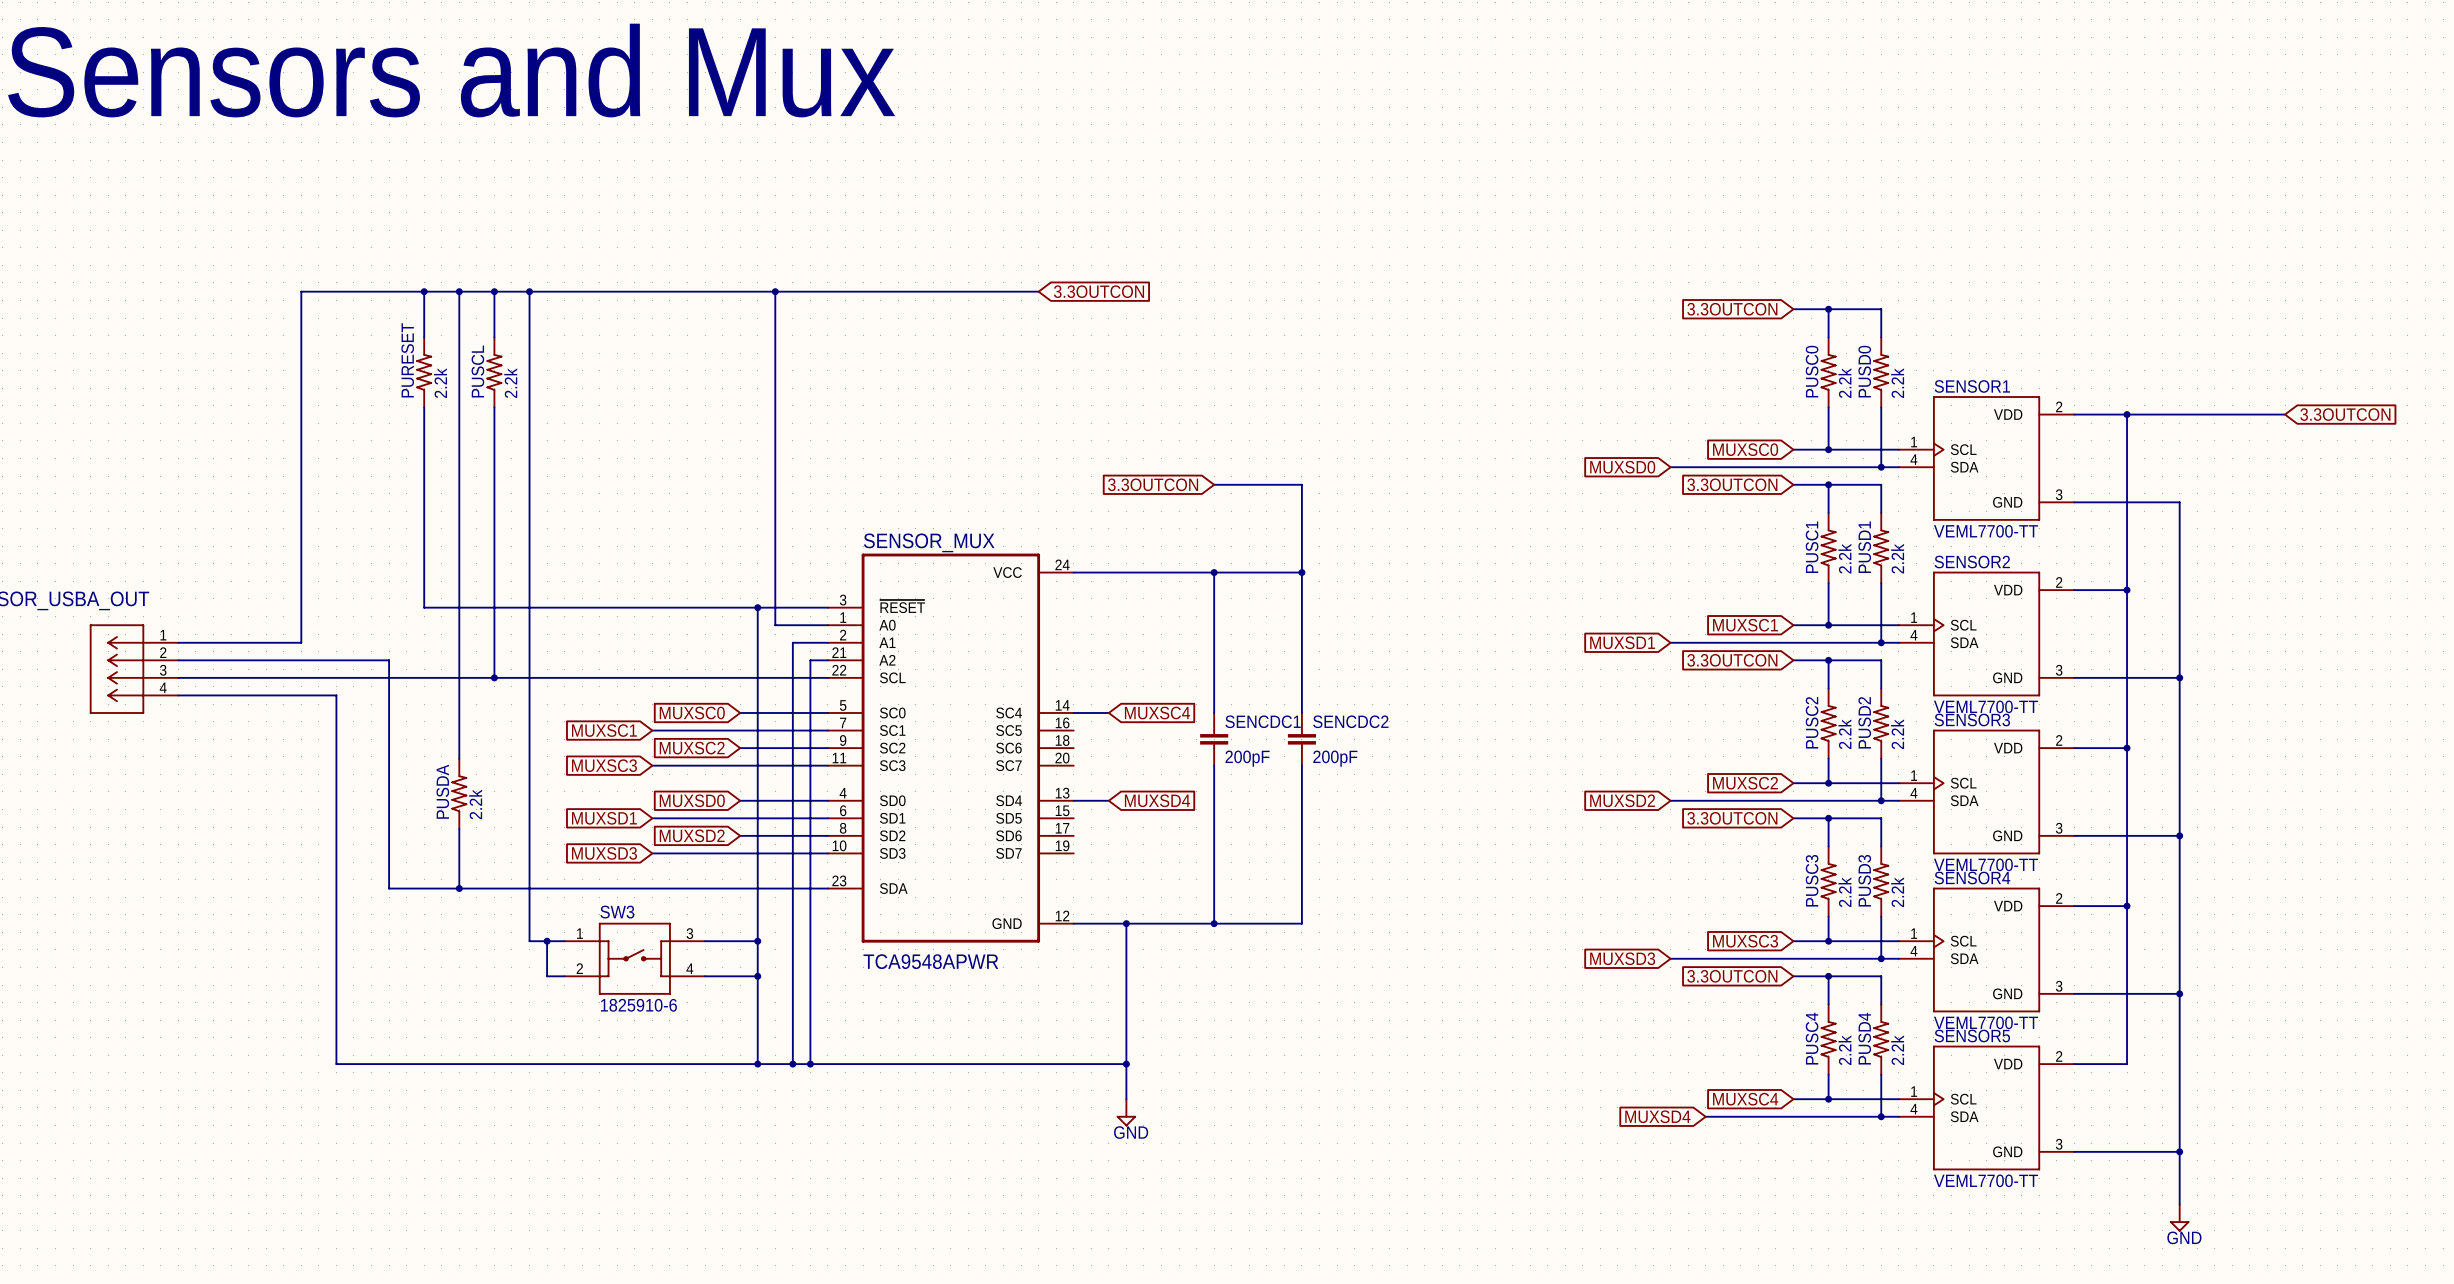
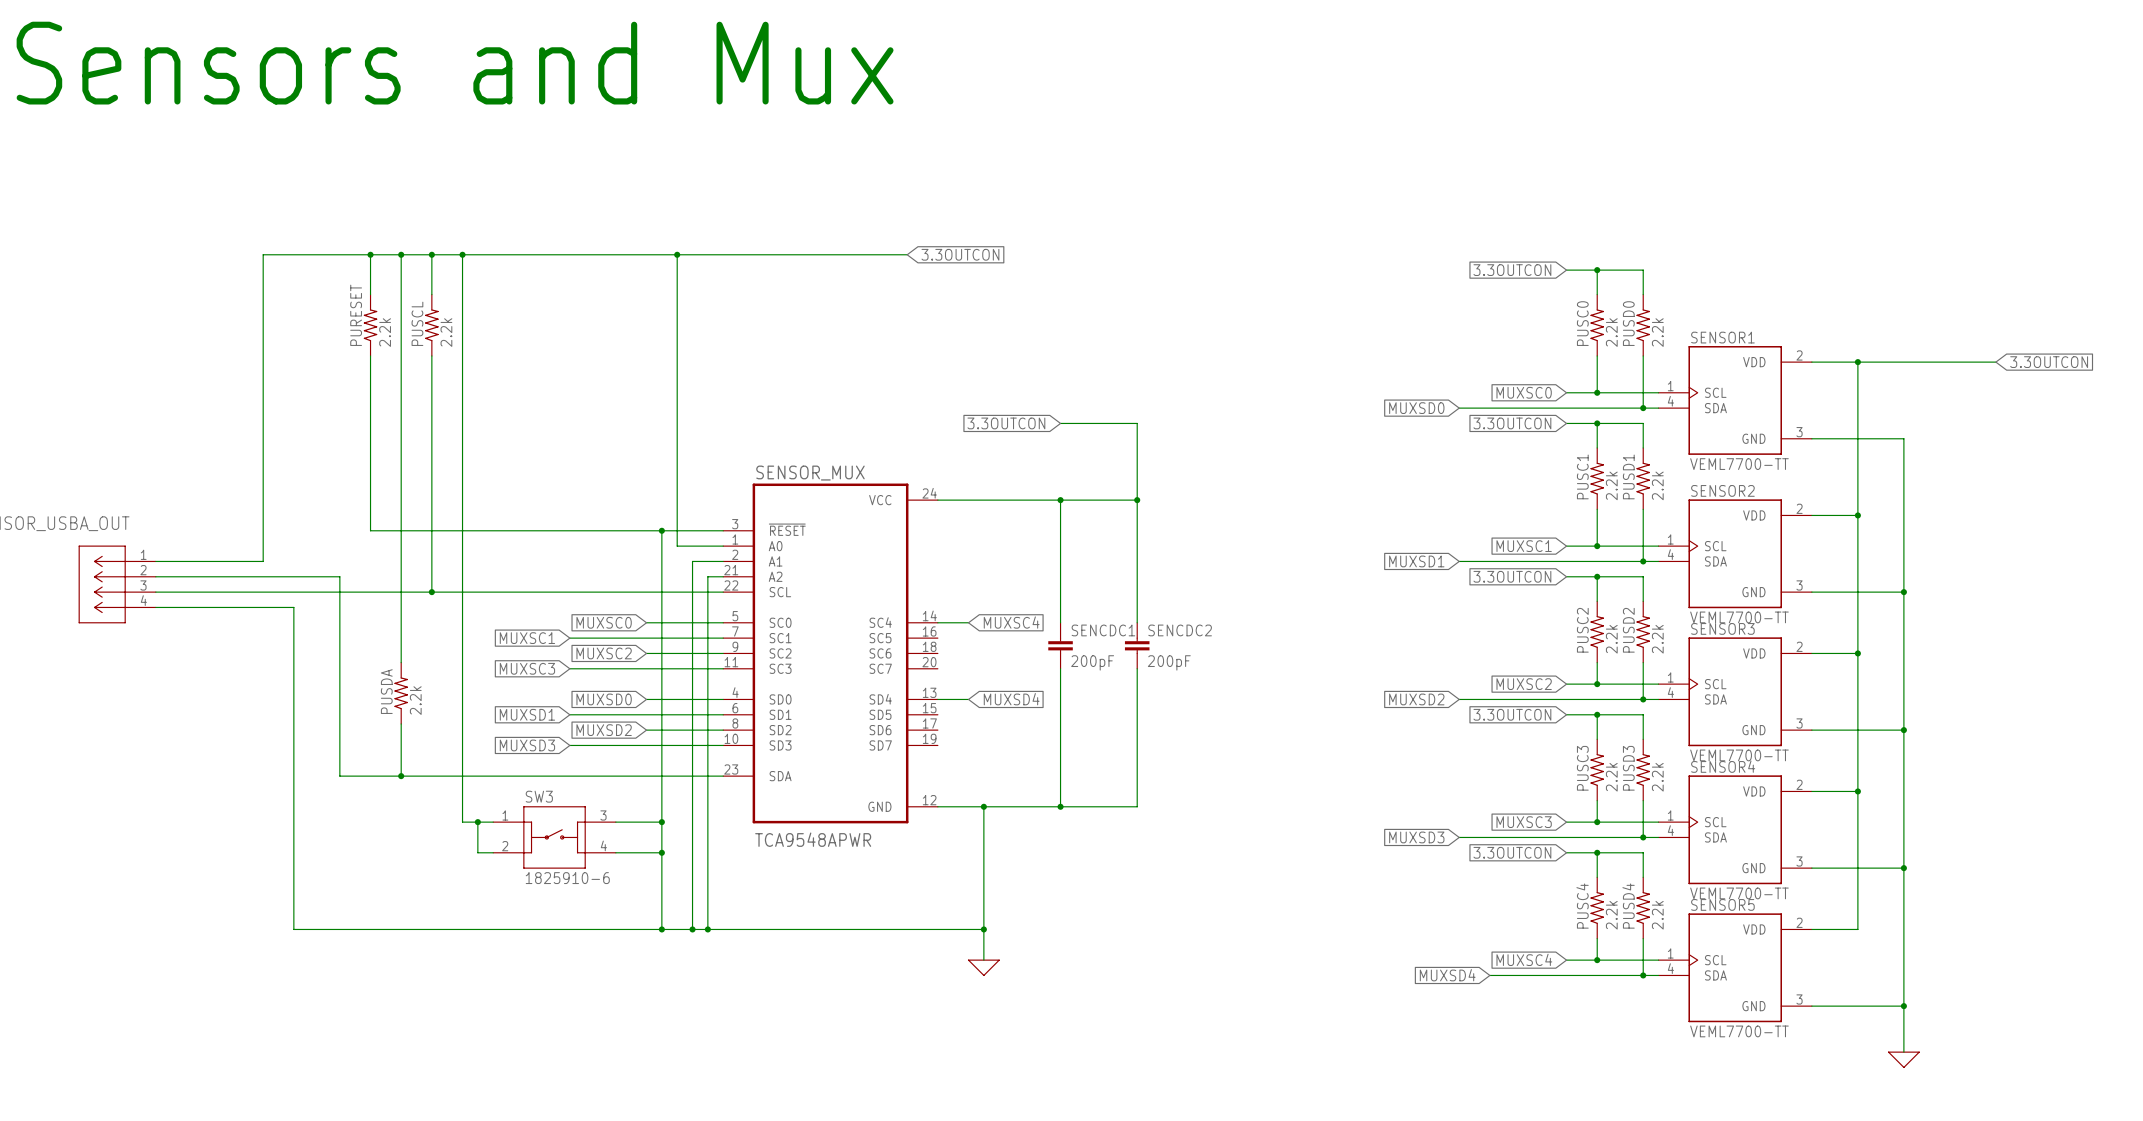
power symbol shape: [1116, 1099, 1137, 1127] -> [968, 959, 1000, 976]
power symbol text: GND (1131, 1132) -> none
power symbol shape: [2170, 1204, 2190, 1232] -> [1888, 1051, 1920, 1068]
power symbol text: GND (2184, 1237) -> none

